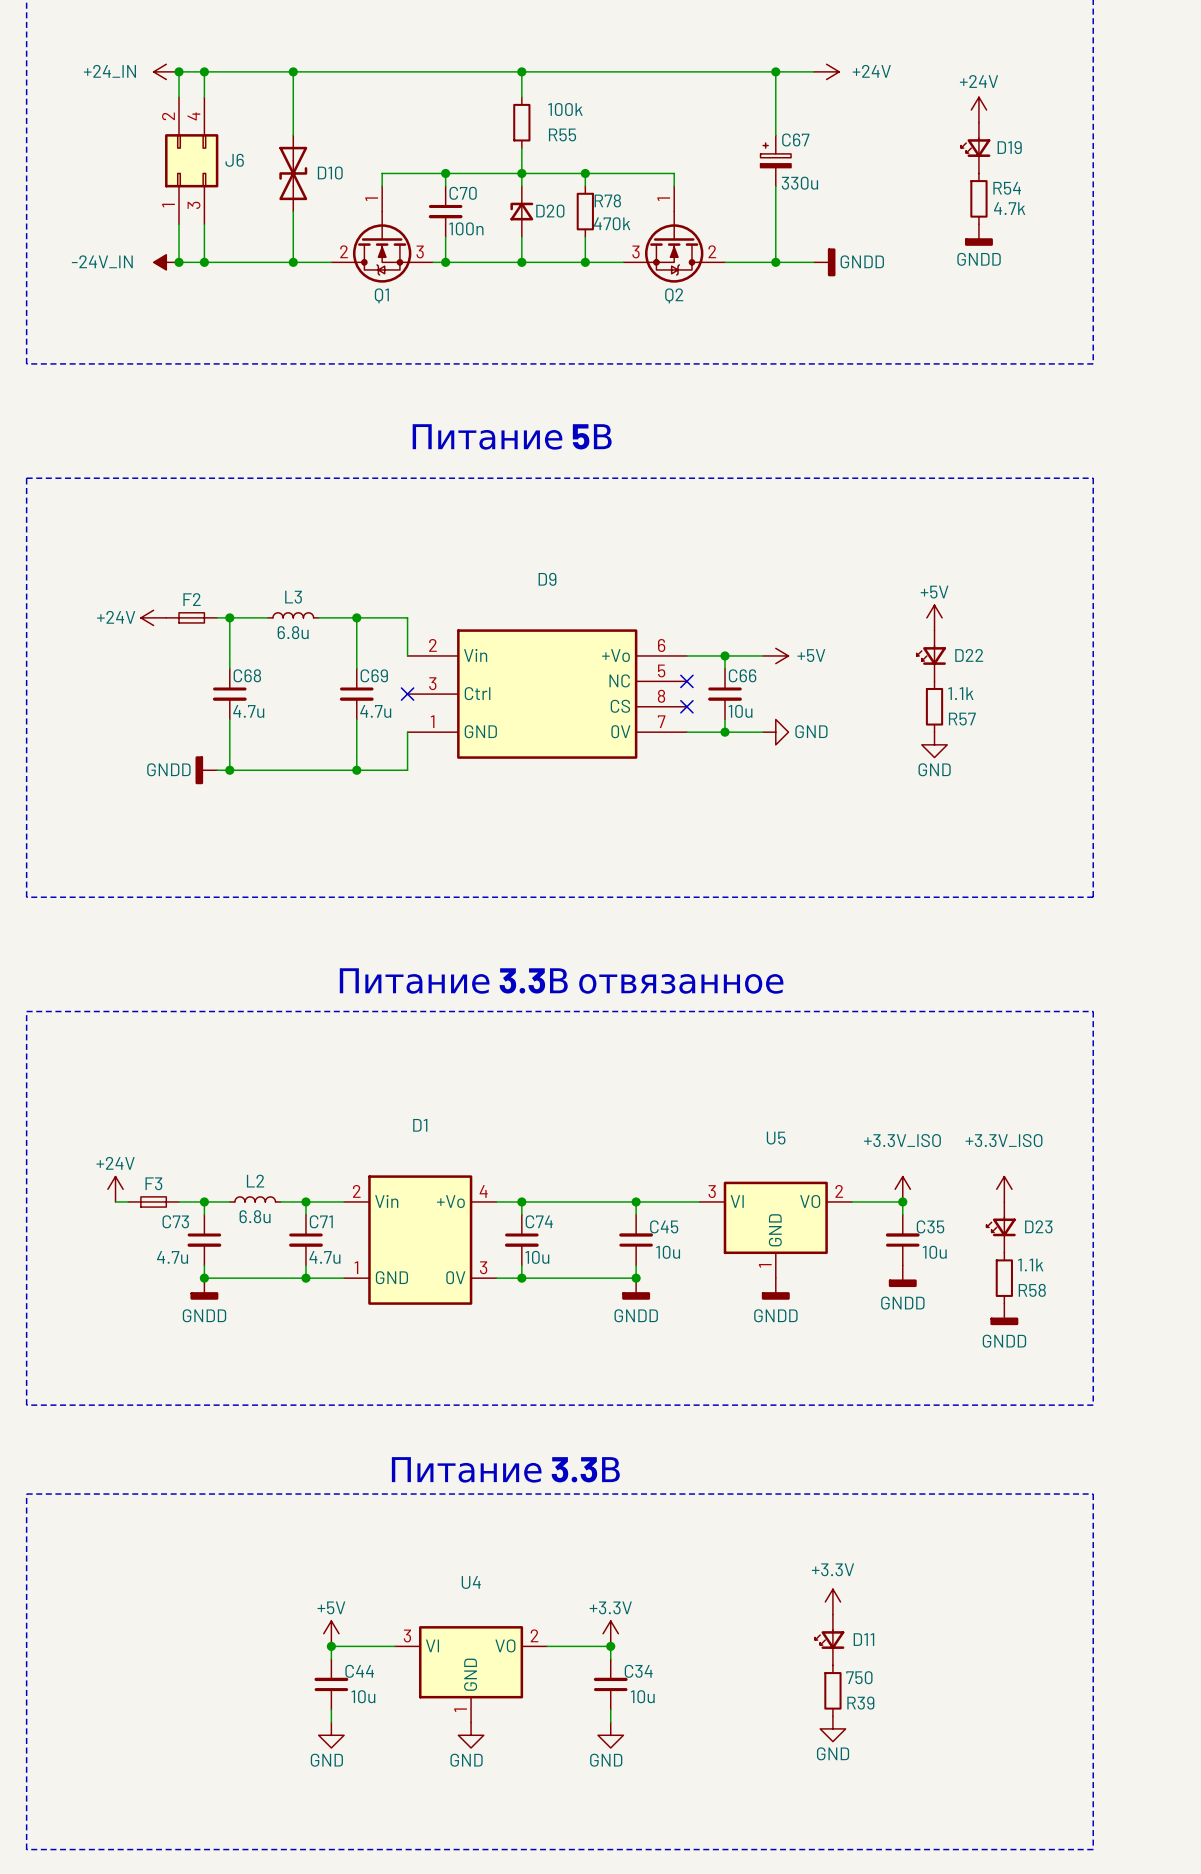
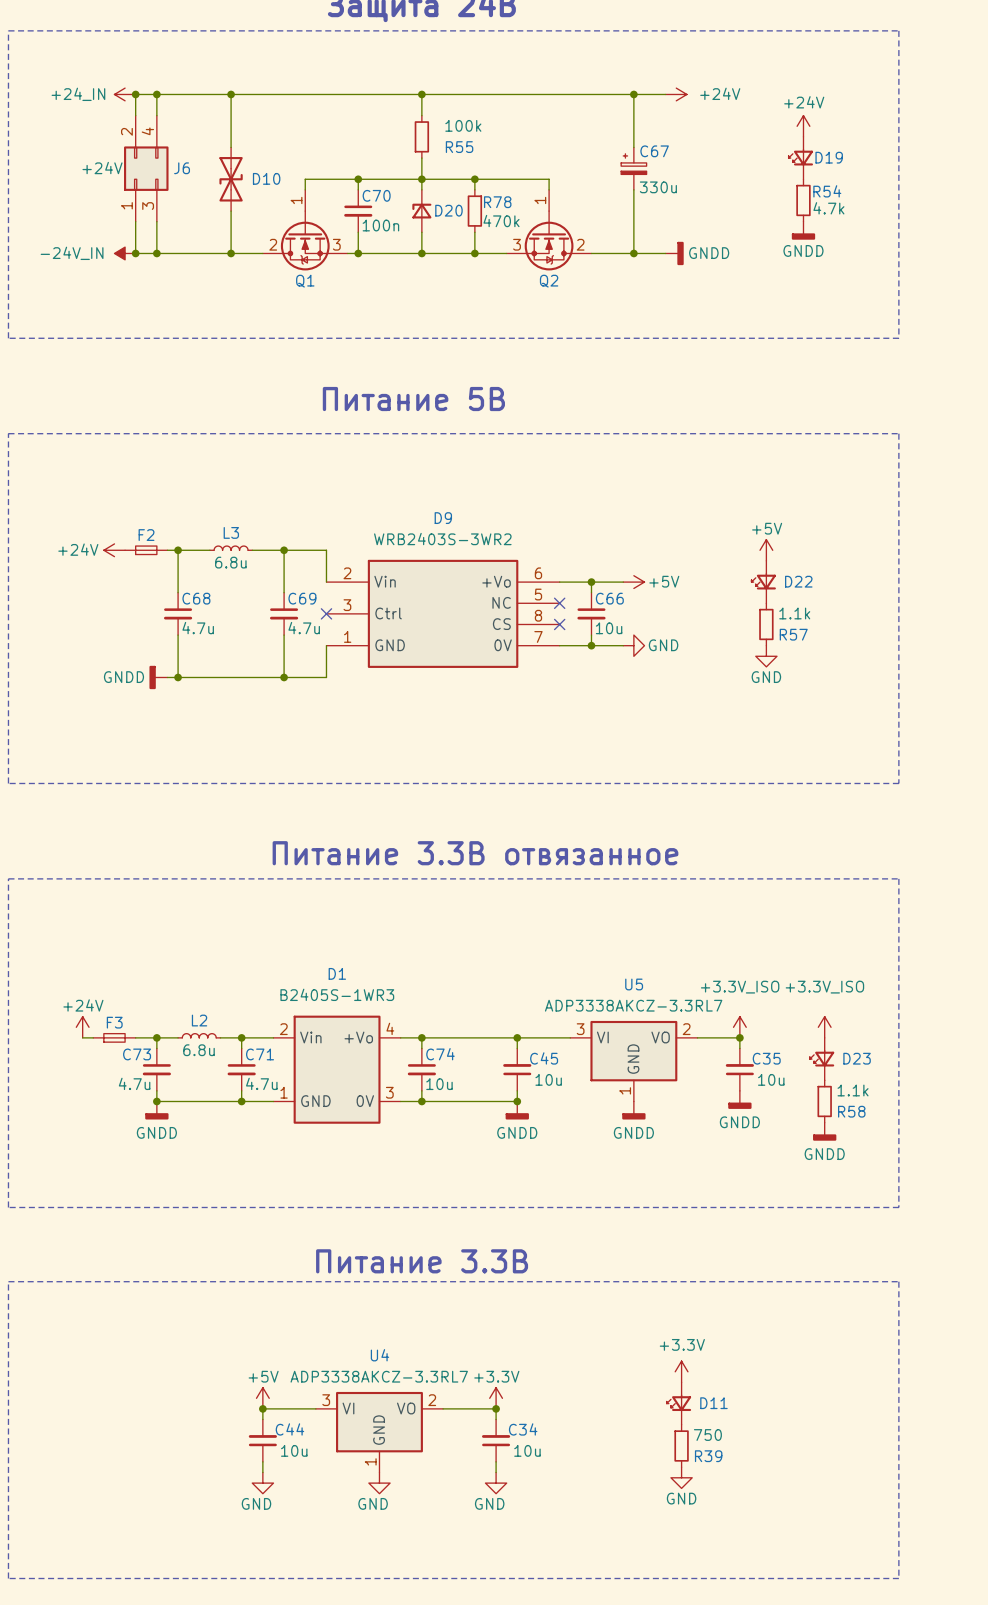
J6 text: none -> +24V (102, 168)
D9 value: none -> WRB2403S-3WR2 (442, 539)
D1 value: none -> B2405S-1WR3 (337, 994)
U5 value: none -> ADP3338AKCZ-3.3RL7 (633, 1005)
U4 value: none -> ADP3338AKCZ-3.3RL7 (379, 1376)

